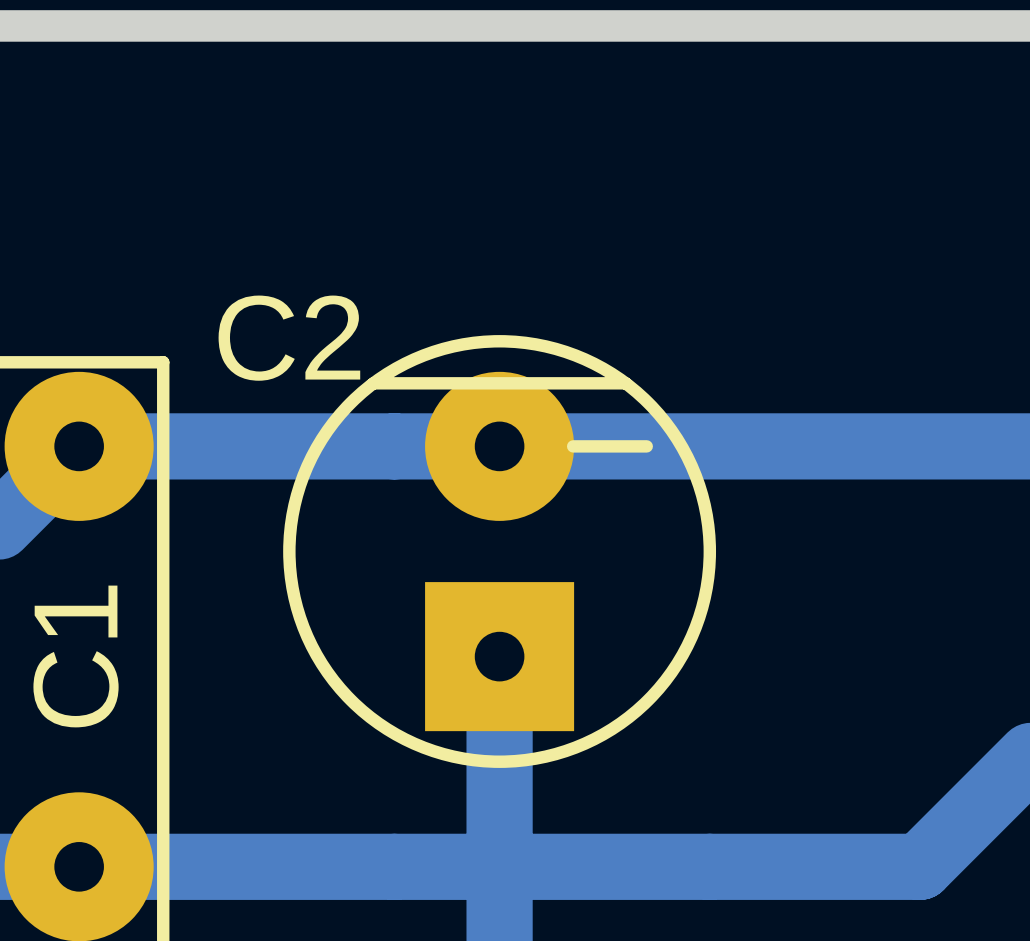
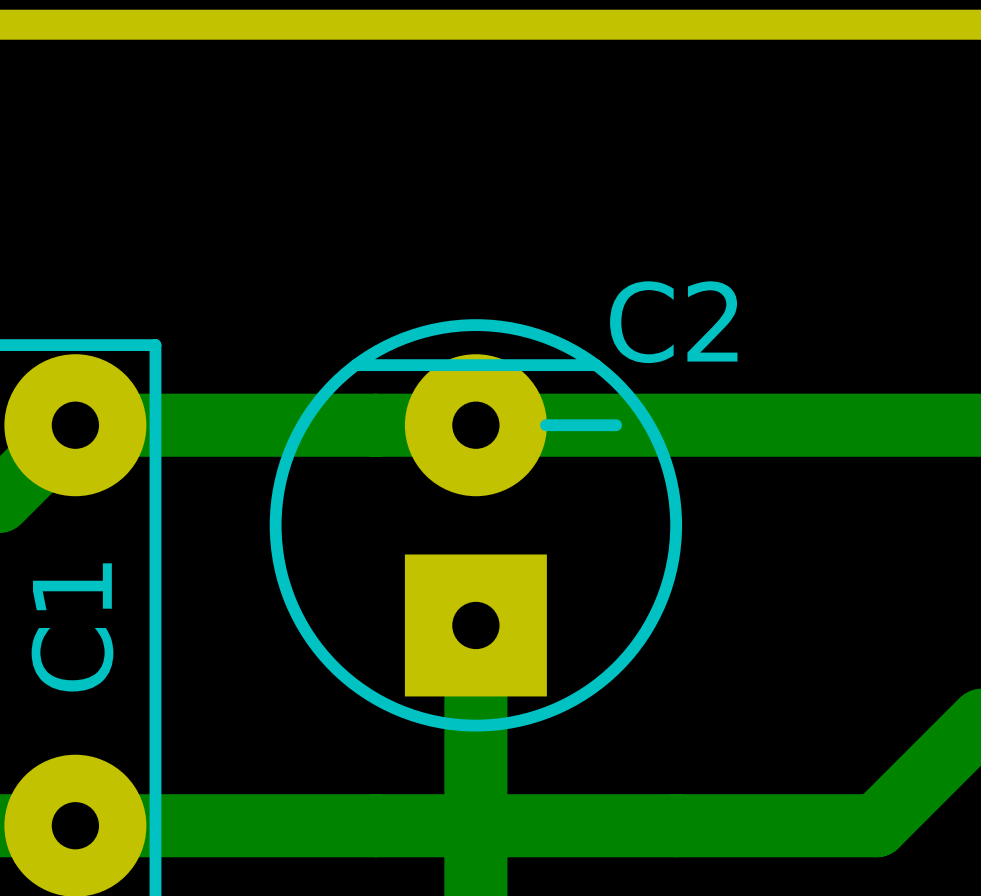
C2 name position: C2 (289, 338) -> C2 (673, 322)

